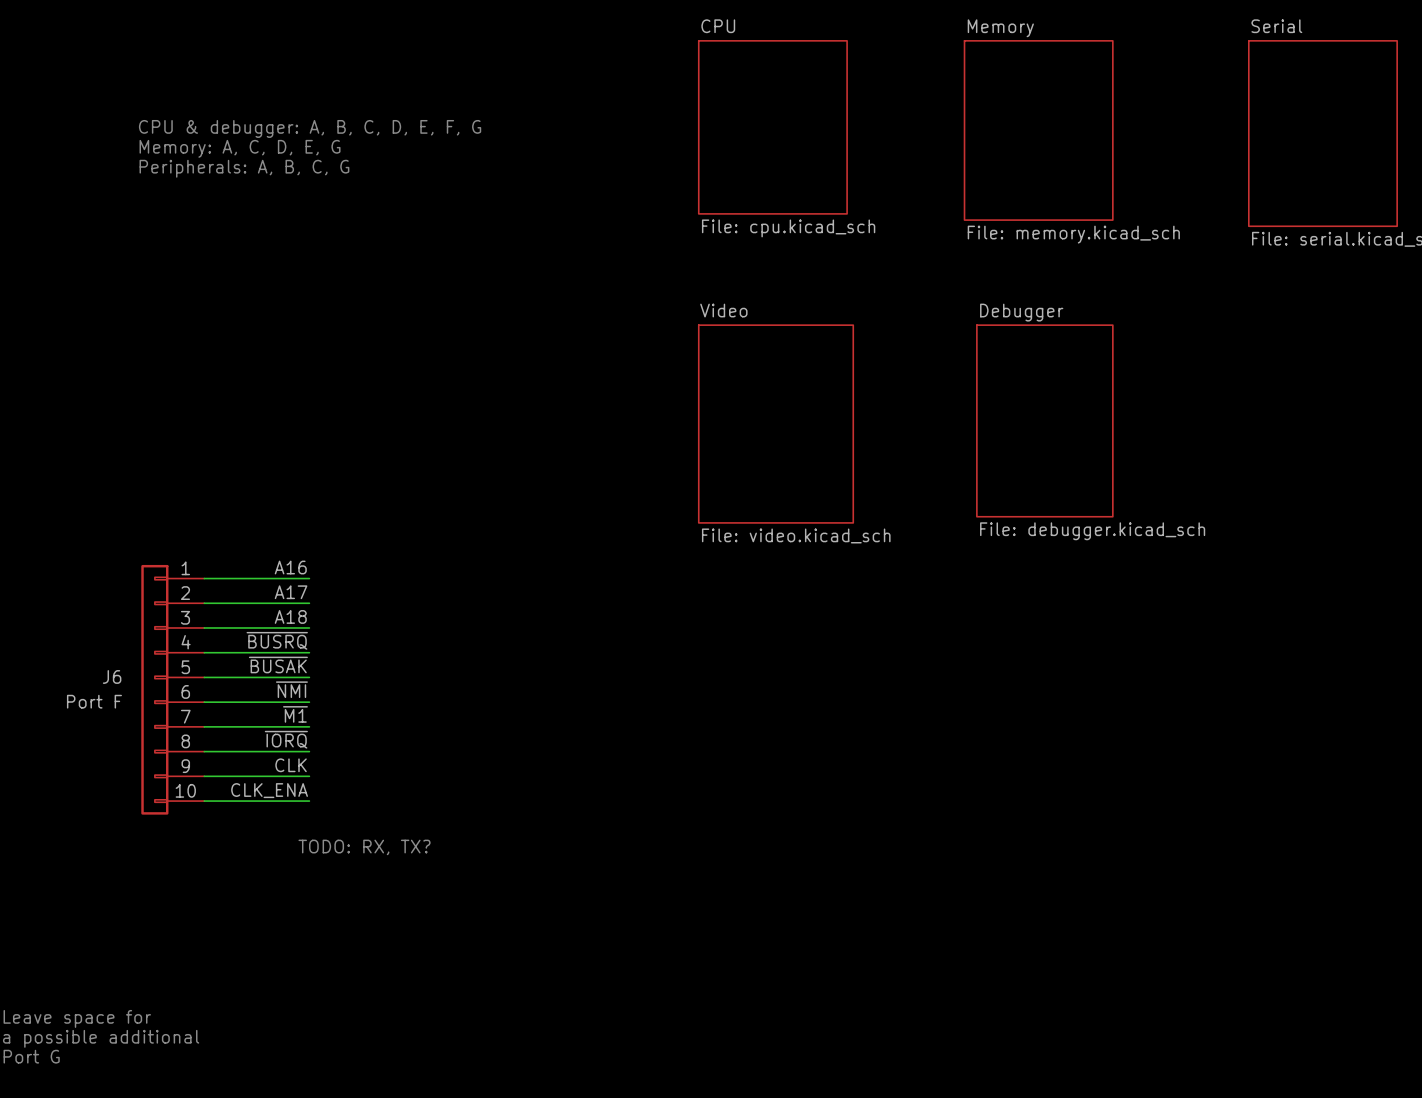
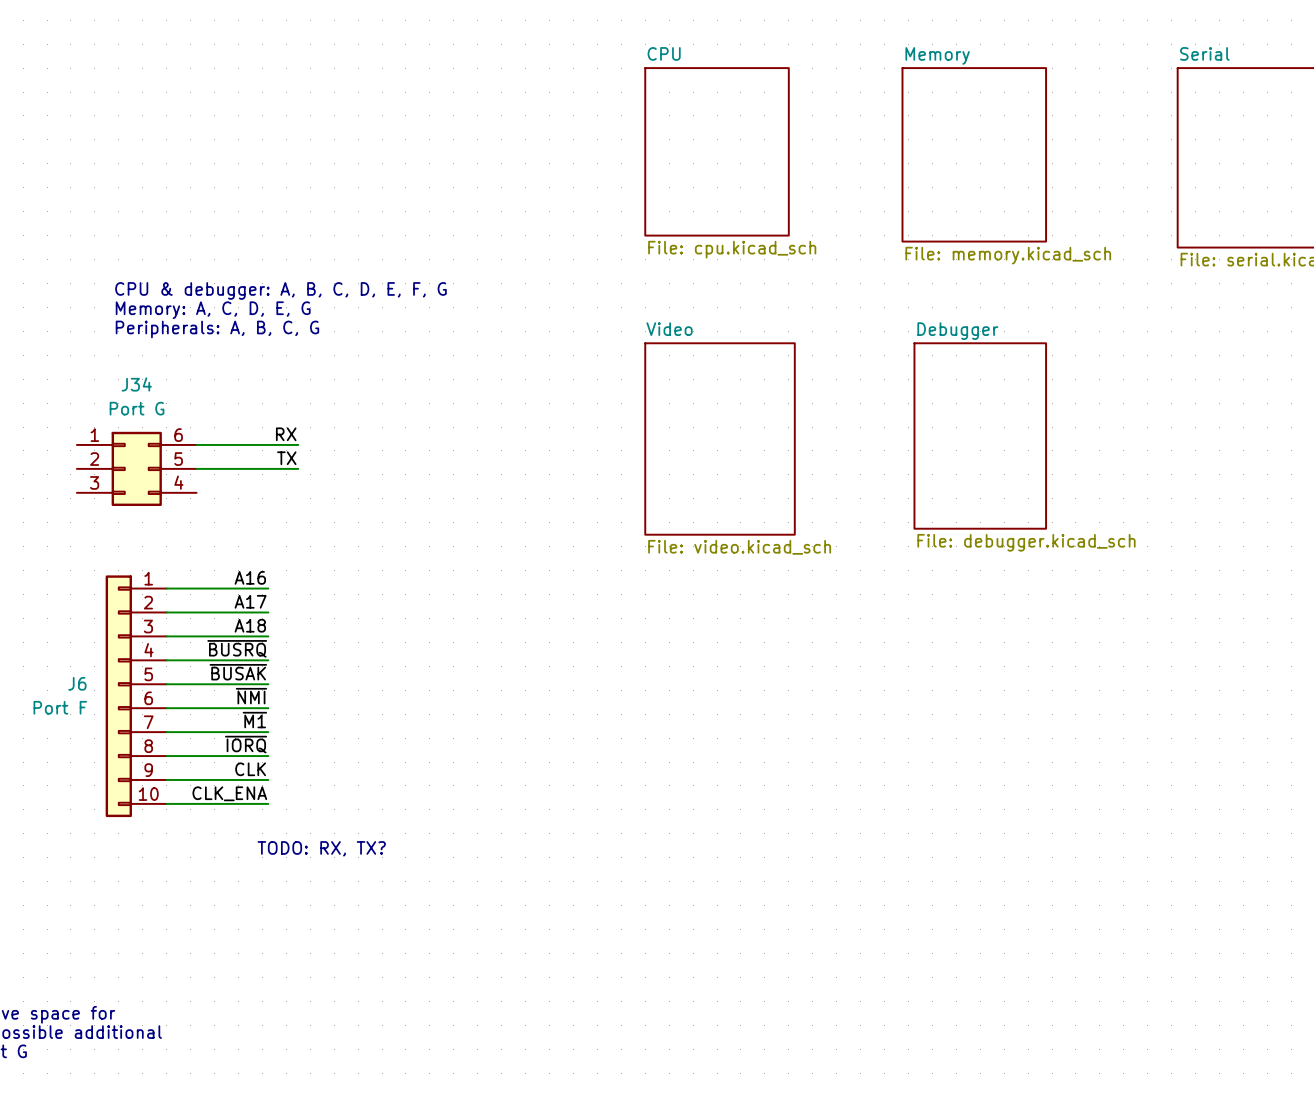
text position: CPU & debugger: A, B, C, D, E, F, G (310, 128) -> CPU & debugger: A, B, C, D, E, F, G (280, 290)
text position: Memory: A, C, D, E, G (240, 148) -> Memory: A, C, D, E, G (213, 310)
text position: Peripherals: A, B, C, G (244, 168) -> Peripherals: A, B, C, G (217, 329)
label: none -> RX (286, 434)
wire: none -> (196, 444) (298, 444)
label: none -> TX (286, 458)
J34: none -> Port G (136, 468)
wire: none -> (196, 468) (298, 468)

